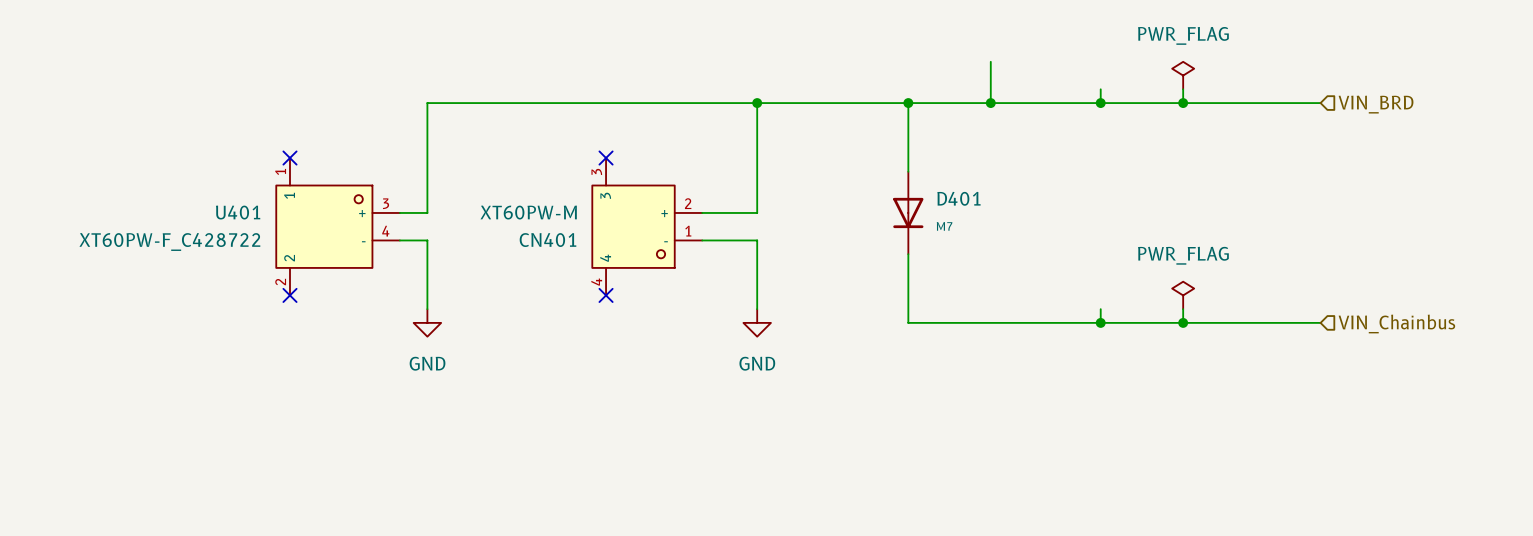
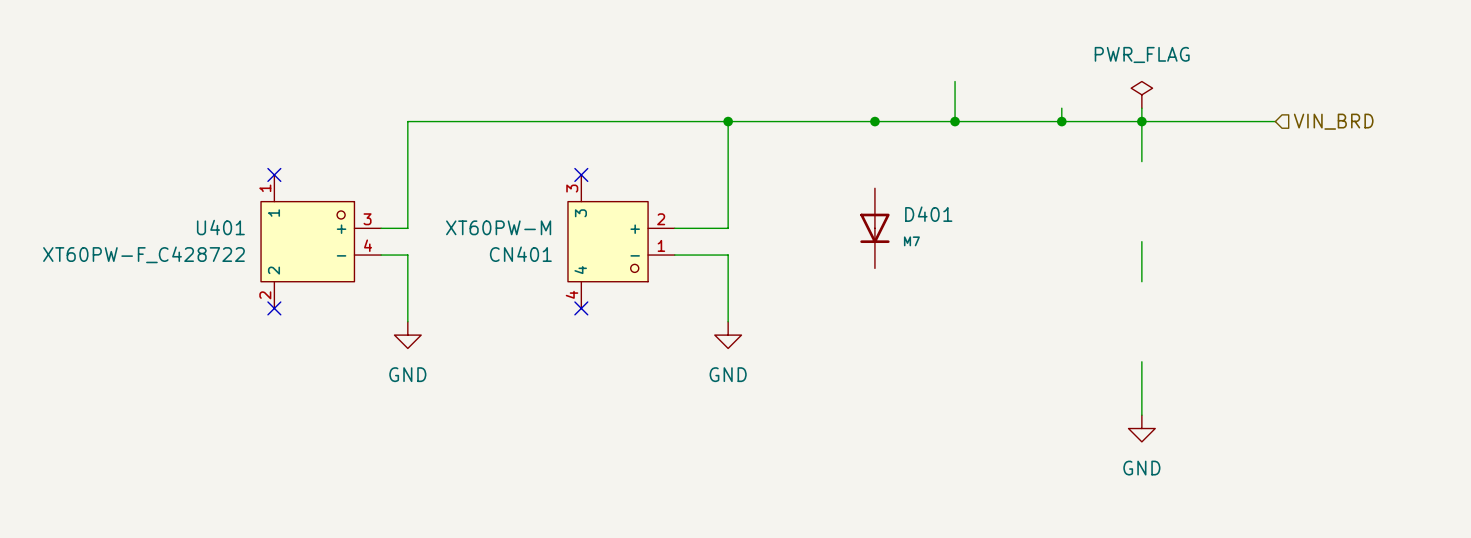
wire: (908, 103) (908, 171) -> none
wire: none -> (1141, 121) (1141, 161)
wire: none -> (1141, 241) (1141, 281)
wire: (908, 254) (908, 322) (1320, 322) -> none
power symbol: PWR_FLAG (1183, 295) -> none
wire: (1100, 309) (1100, 322) -> none
wire: (1183, 309) (1183, 322) -> none
junction: (1100, 322) -> none
junction: (1183, 322) -> none
hierarchical label: VIN_Chainbus (1396, 324) -> none
wire: none -> (1141, 361) (1141, 415)
power symbol: none -> GND (1141, 428)

